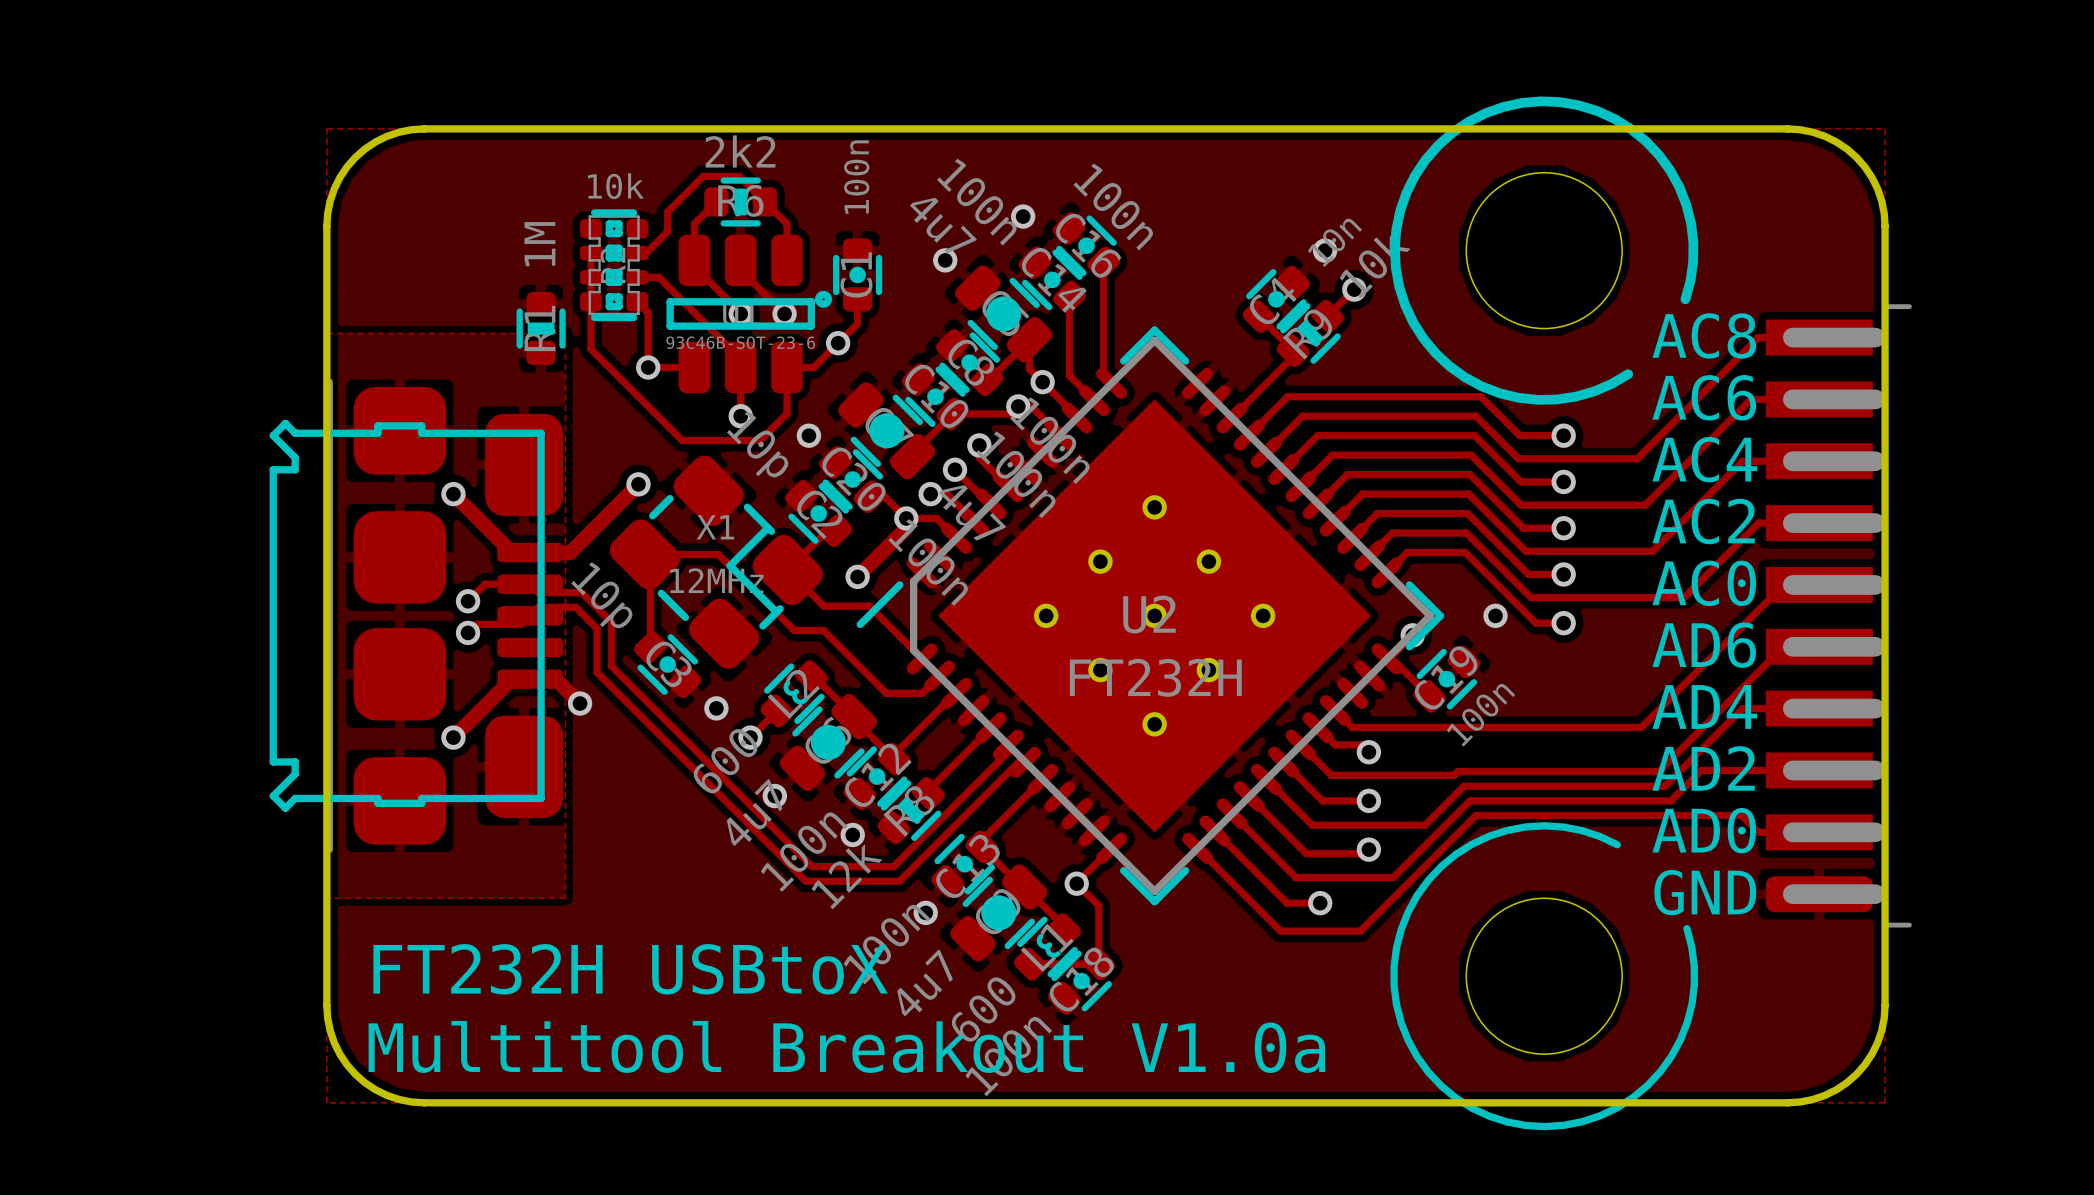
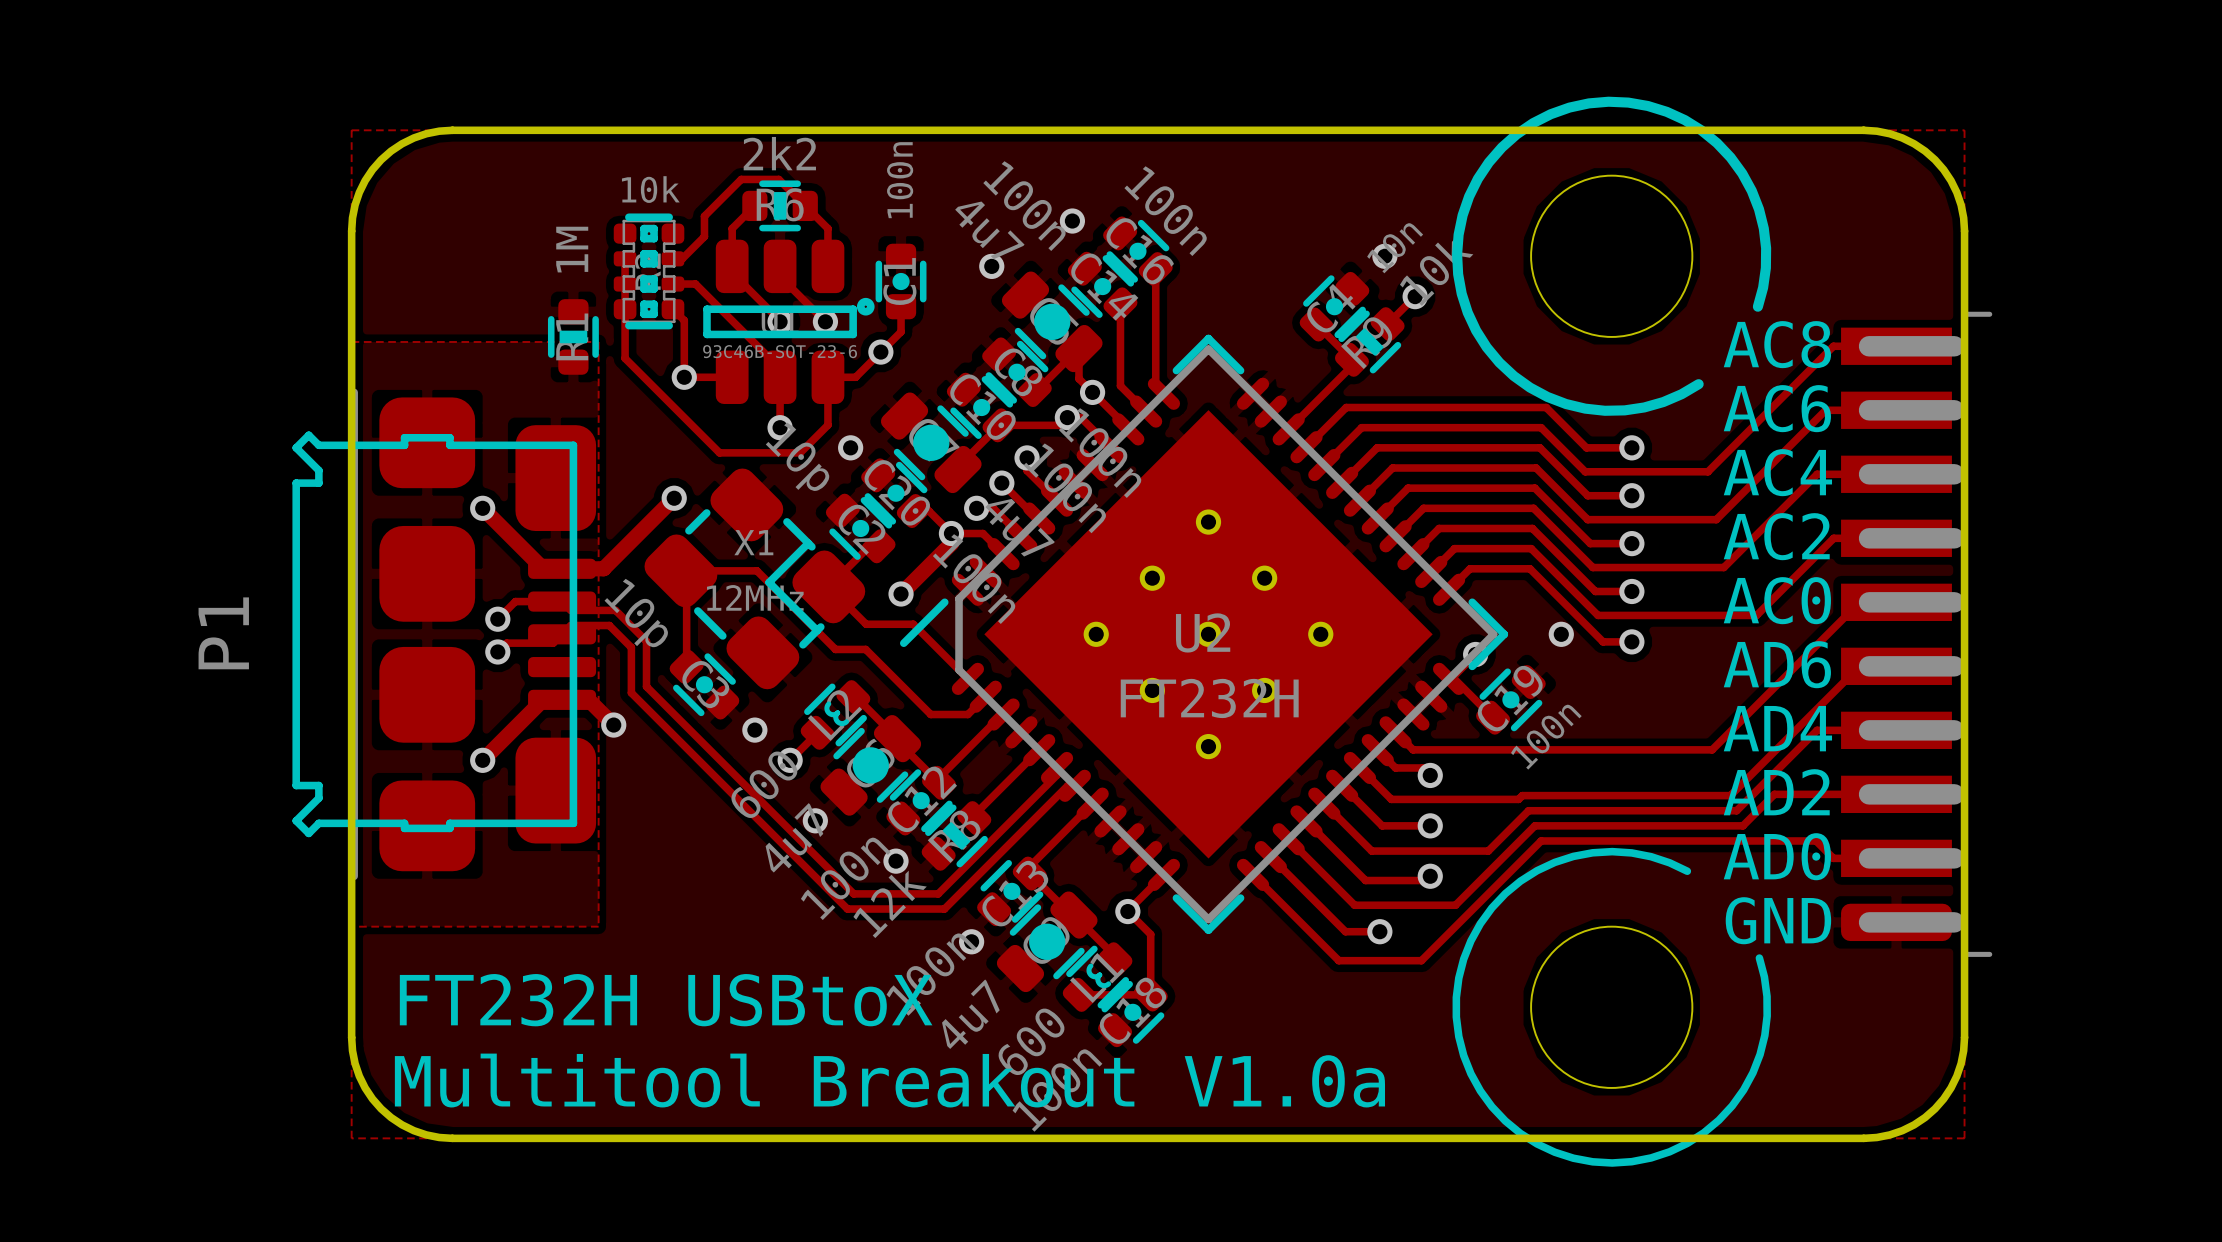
P1 name: none -> P1 (223, 633)

